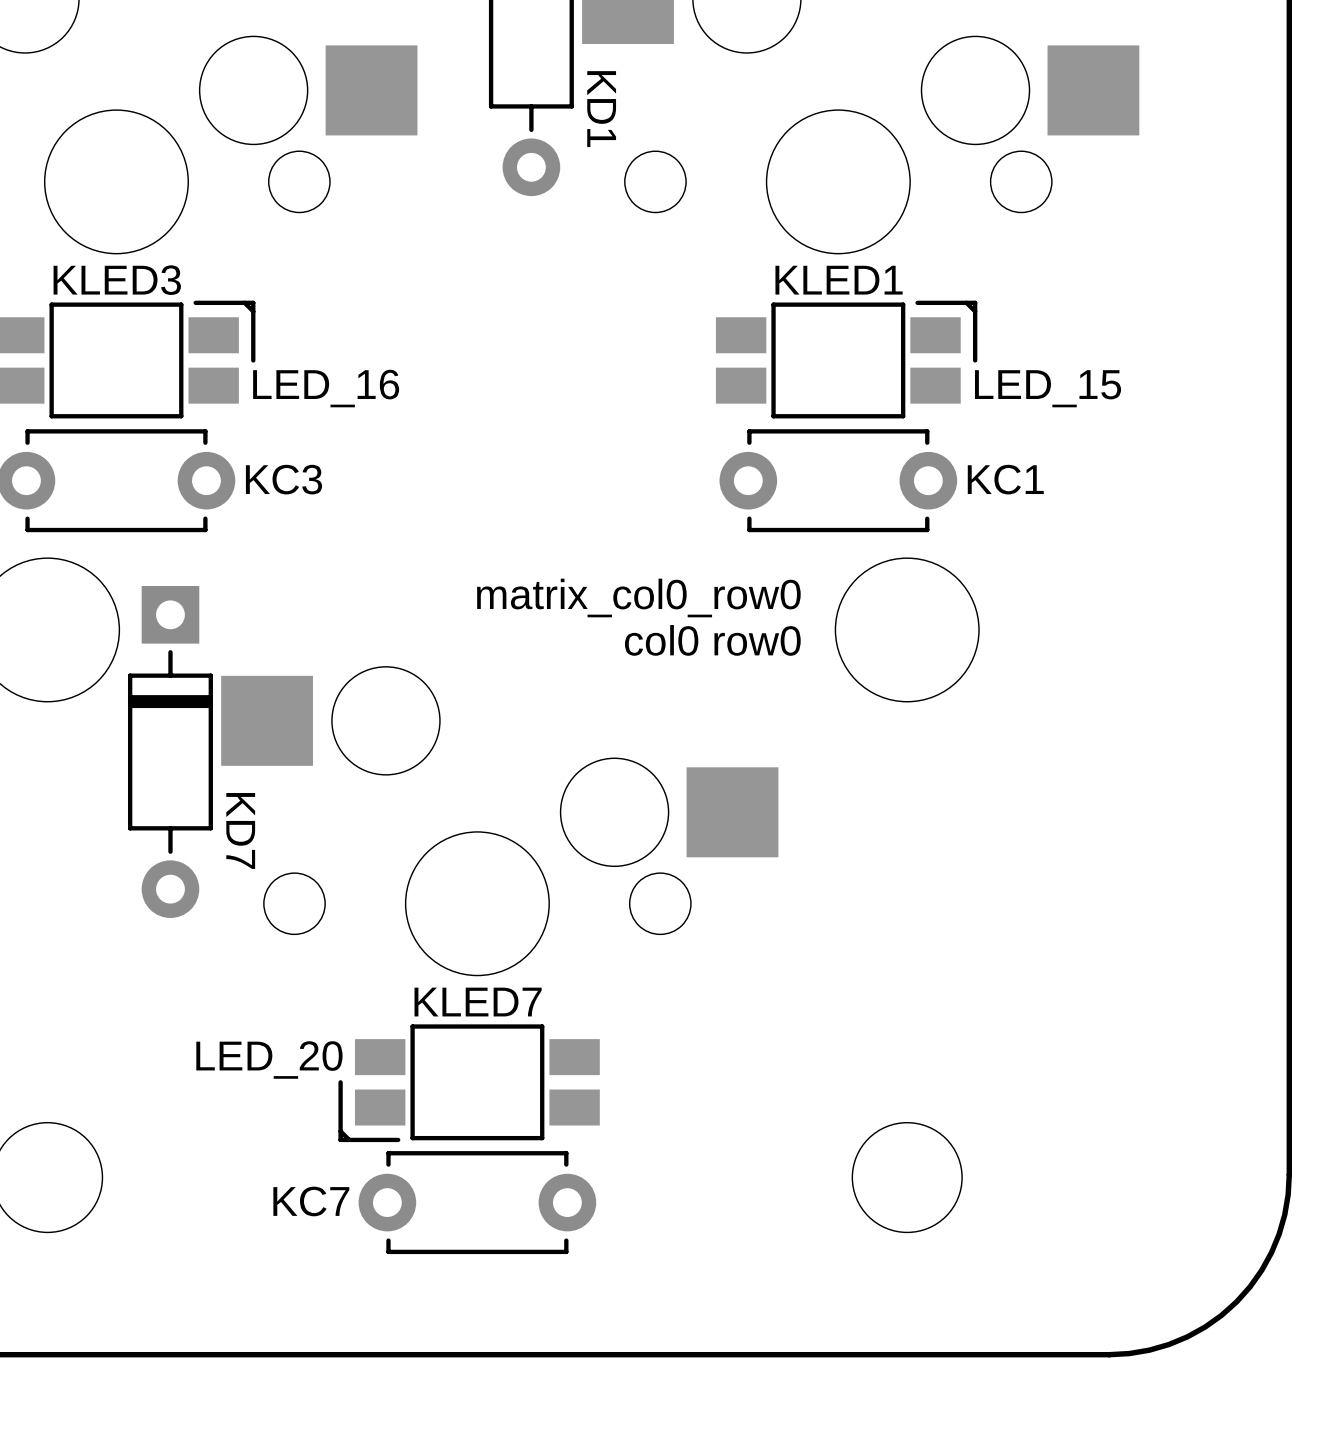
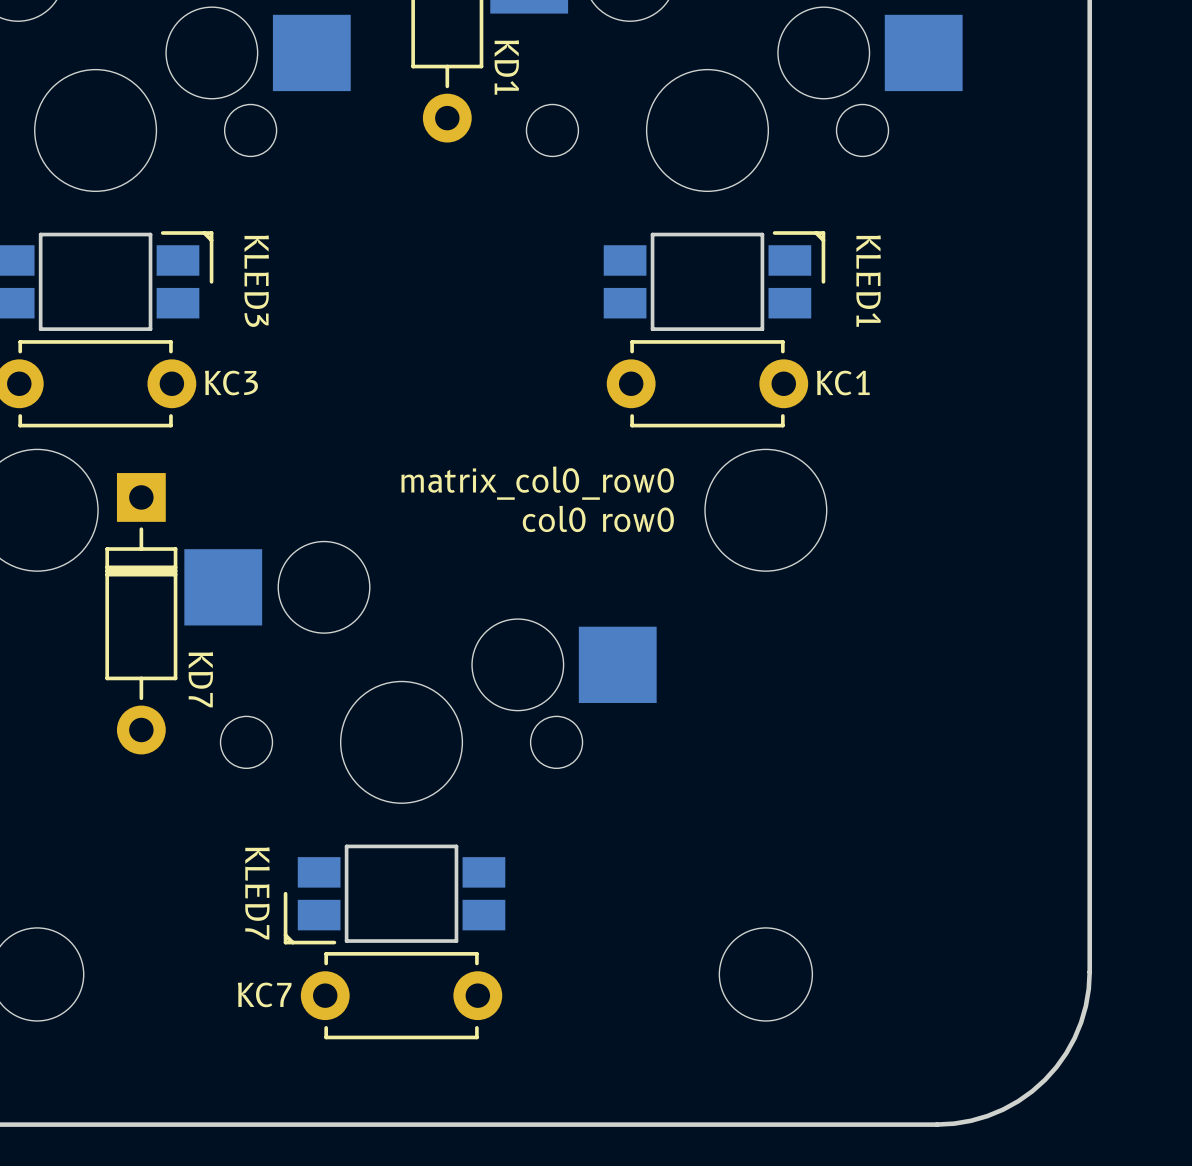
KLED3 name rotation: 0° (117, 280) -> 90° clockwise (256, 281)
KLED3 name position: KLED3 (117, 280) -> KLED3 (256, 281)
KLED1 name rotation: 0° (839, 280) -> 90° clockwise (868, 281)
KLED1 name position: KLED1 (839, 280) -> KLED1 (868, 281)
text: LED_16 (326, 388) -> none
text: LED_15 (1048, 388) -> none
KLED7 name rotation: 0° (478, 1002) -> 90° clockwise (257, 893)
KLED7 name position: KLED7 (478, 1002) -> KLED7 (257, 893)
text: LED_20 (269, 1059) -> none

